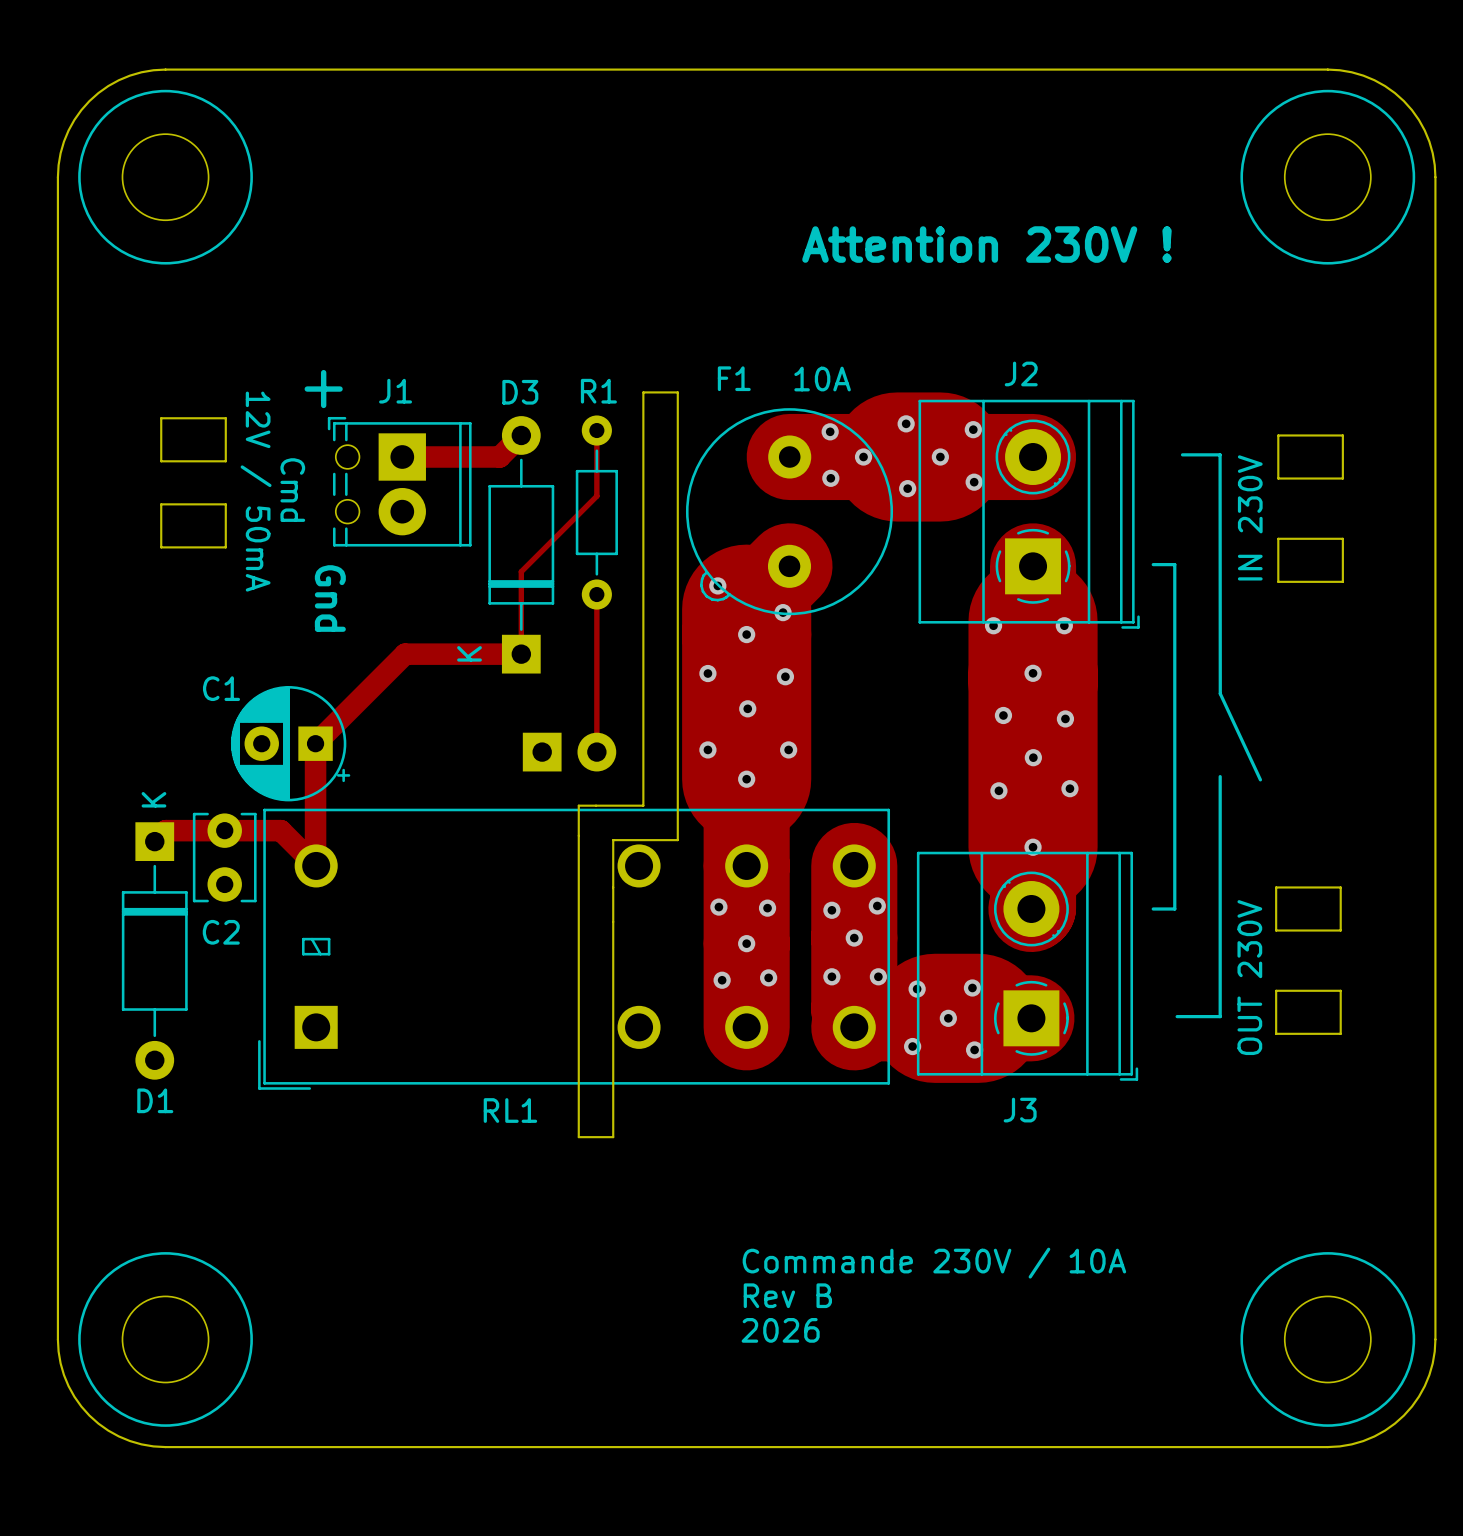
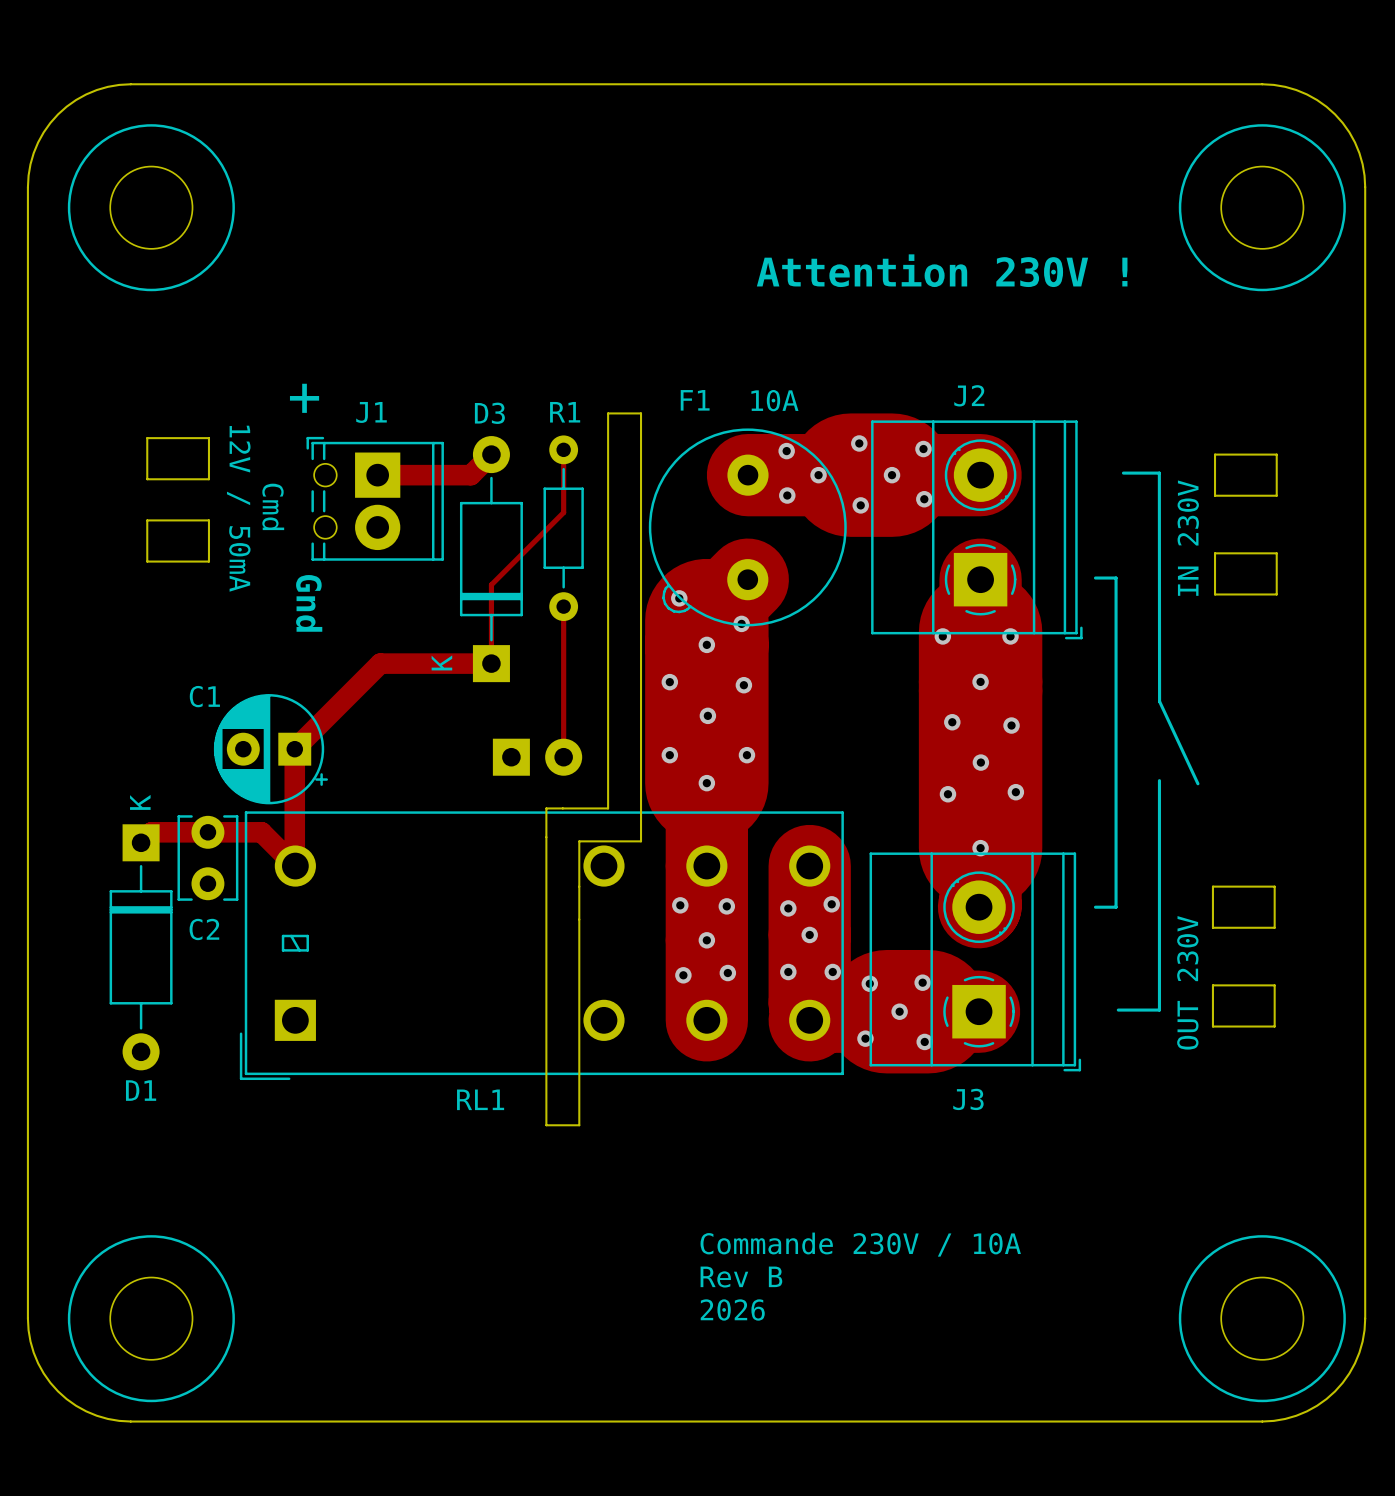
board edge: (1435, 177) (1429, 141) (1411, 110) (1394, 93) (1374, 80) (1339, 70) (165, 69) (141, 72) (118, 80) (89, 101) (74, 119) (63, 141) (57, 177) (58, 1351) (68, 1386) (81, 1406) (98, 1423) (129, 1441) (165, 1447) -> (1365, 207) (1362, 164) (1355, 142) (1342, 122) (1317, 100) (1296, 90) (1273, 84) (130, 84) (107, 86) (86, 94) (58, 114) (38, 142) (30, 164) (27, 187) (28, 1330) (33, 1352) (43, 1373) (66, 1399) (86, 1411) (107, 1418) (151, 1421)

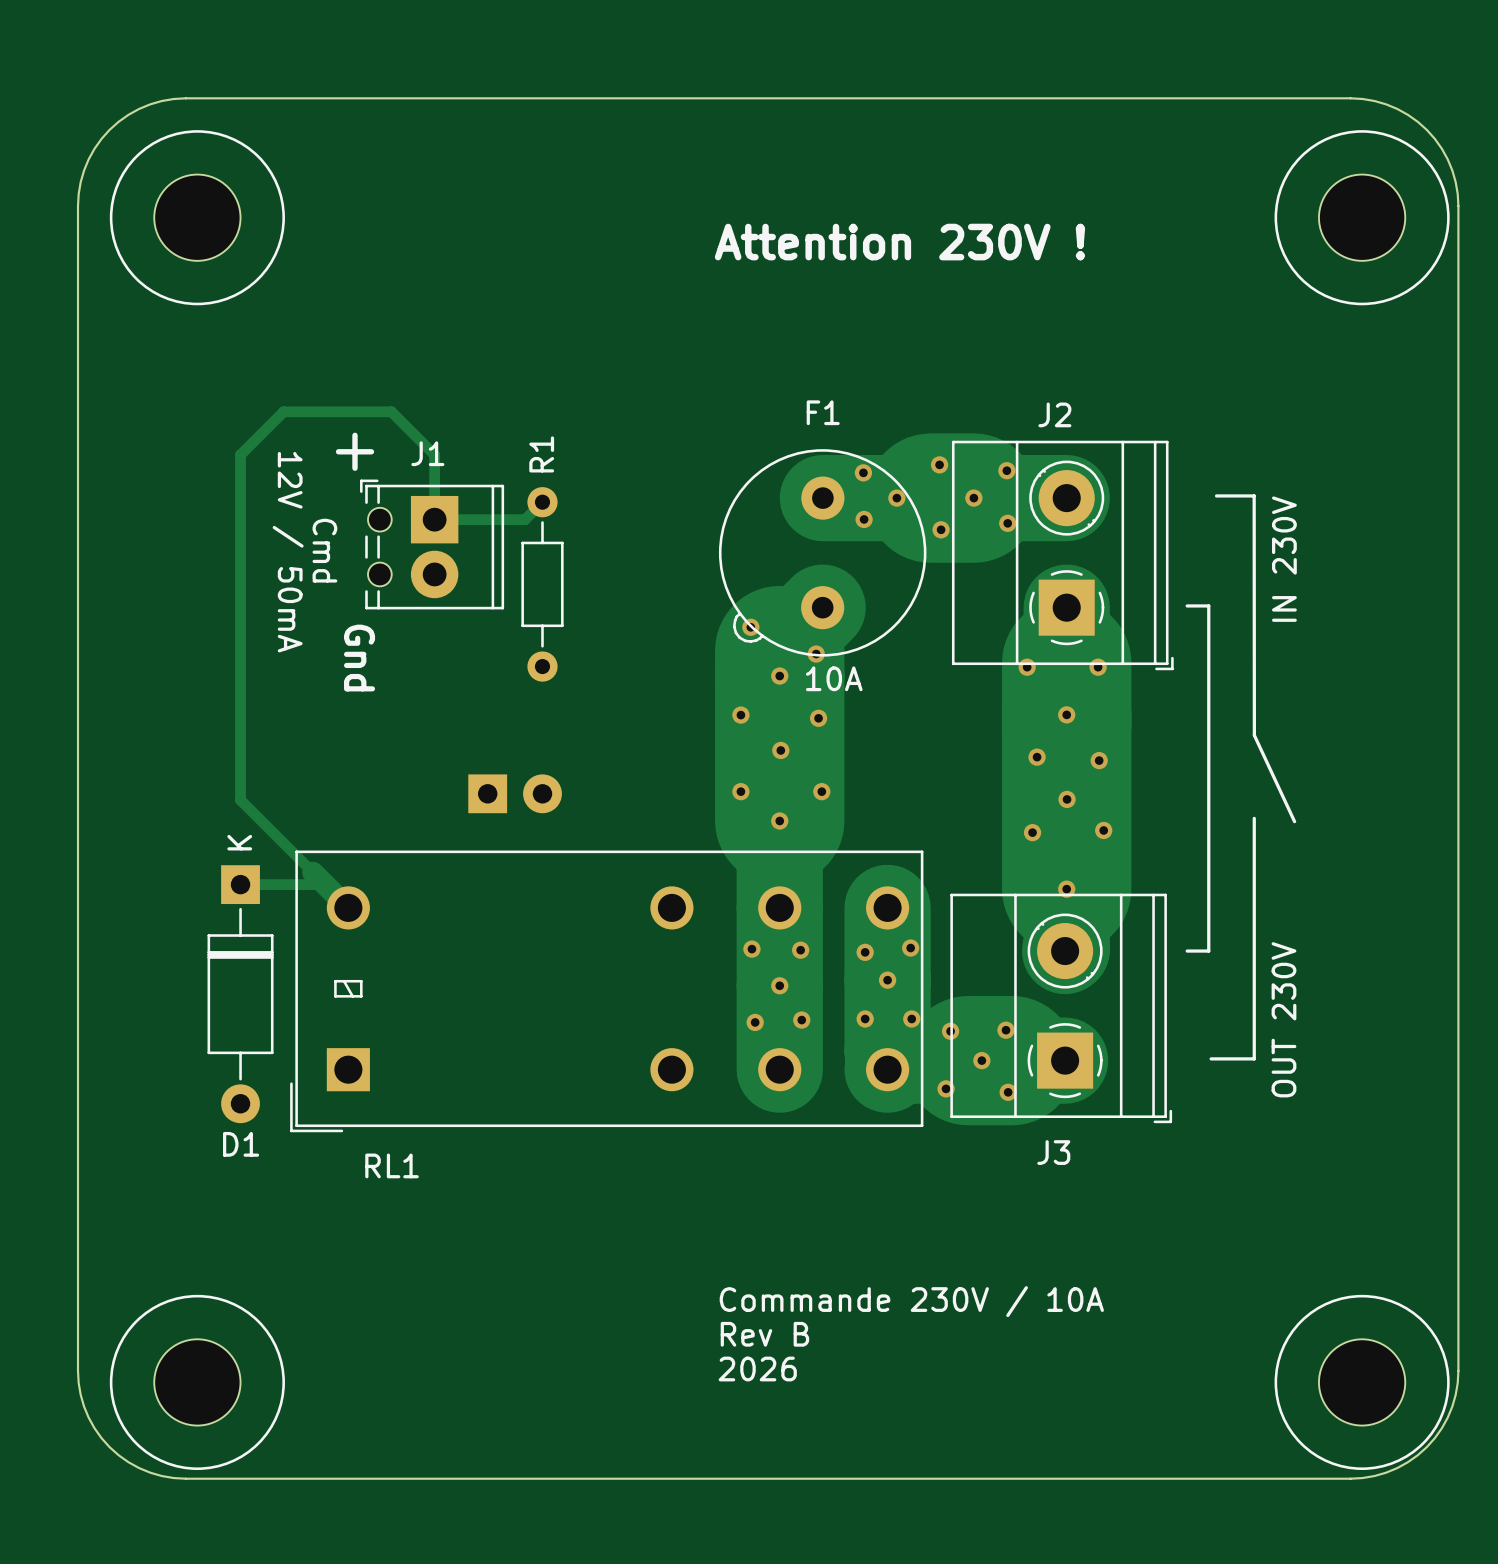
board edge: (130, 84) (1262, 84) (1296, 90) (1317, 100) (1335, 114) (1349, 132) (1359, 153) (1365, 187) (1365, 1318) (1359, 1352) (1349, 1373) (1335, 1391) (1306, 1411) (1285, 1418) (1262, 1421) (130, 1421) (96, 1415) (76, 1405) (58, 1391) (43, 1373) (33, 1352) (27, 1318) (27, 187) (30, 164) (38, 142) (58, 114) (86, 94) (107, 86) (130, 84) -> (185, 98) (150, 104) (118, 121) (94, 148) (84, 170) (78, 194) (77, 1370) (80, 1394) (88, 1417) (109, 1447) (139, 1468) (161, 1476) (185, 1478) (1350, 1478) (1374, 1476) (1397, 1468) (1426, 1447) (1441, 1428) (1452, 1406) (1458, 1370) (1458, 206) (1452, 170) (1441, 148) (1426, 129) (1397, 108) (1374, 101) (1350, 98) (185, 98)
text position: Attention 230V ! (942, 270) -> Attention 230V ! (899, 242)
text position: + (304, 398) -> + (354, 451)
F1 name position: F1 (695, 400) -> F1 (823, 412)
text position: 10A (774, 400) -> 10A (834, 678)
R1 name rotation: 0° (565, 412) -> 90° counterclockwise (541, 454)
board edge: (608, 413) (608, 808) (546, 808) (546, 1125) (579, 1125) (579, 841) (641, 841) (641, 413) (608, 413) -> none
board edge: (147, 438) (208, 438) (208, 479) (147, 479) (147, 438) -> none
track: (563, 449) (563, 512) (491, 584) (491, 663) (380, 663) (294, 749) (294, 865) -> none
track: (491, 454) (470, 475) (377, 475) -> none
board edge: (1215, 454) (1215, 495) (1276, 495) (1276, 454) (1215, 454) -> none
J1 position: (375, 498) -> (432, 544)
text position: Cmd (273, 506) -> Cmd (324, 550)
text position: 12V / 50mA (238, 508) -> 12V / 50mA (288, 552)
board edge: (147, 520) (147, 561) (208, 561) (208, 520) (147, 520) -> none
R1 position: (563, 528) -> (542, 584)
board edge: (1215, 553) (1276, 553) (1276, 594) (1215, 594) (1215, 553) -> none
D3: (491, 559) -> none
text position: Gnd (309, 603) -> Gnd (359, 658)
track: (563, 606) (563, 757) -> none
C1: (270, 749) -> none
part position: (537, 757) -> (515, 793)
track: (261, 832) (151, 832) (141, 842) -> (313, 872) (240, 800) (240, 454) (283, 411) (391, 411) (434, 454) (434, 519) (525, 519) (542, 502)
track: none -> (240, 884) (325, 884)
C2: (207, 858) -> none
board edge: (1212, 886) (1274, 886) (1274, 927) (1212, 927) (1212, 886) -> none
D1 position: (141, 947) -> (240, 994)
board edge: (1212, 985) (1212, 1026) (1274, 1026) (1274, 985) (1212, 985) -> none
RL1 name position: RL1 (480, 1099) -> RL1 (392, 1165)
text position: Commande 230V / 10A (860, 1244) -> Commande 230V / 10A (911, 1301)
text position: Rev B (741, 1277) -> Rev B (764, 1334)
text position: 2026 (732, 1309) -> 2026 (757, 1369)

